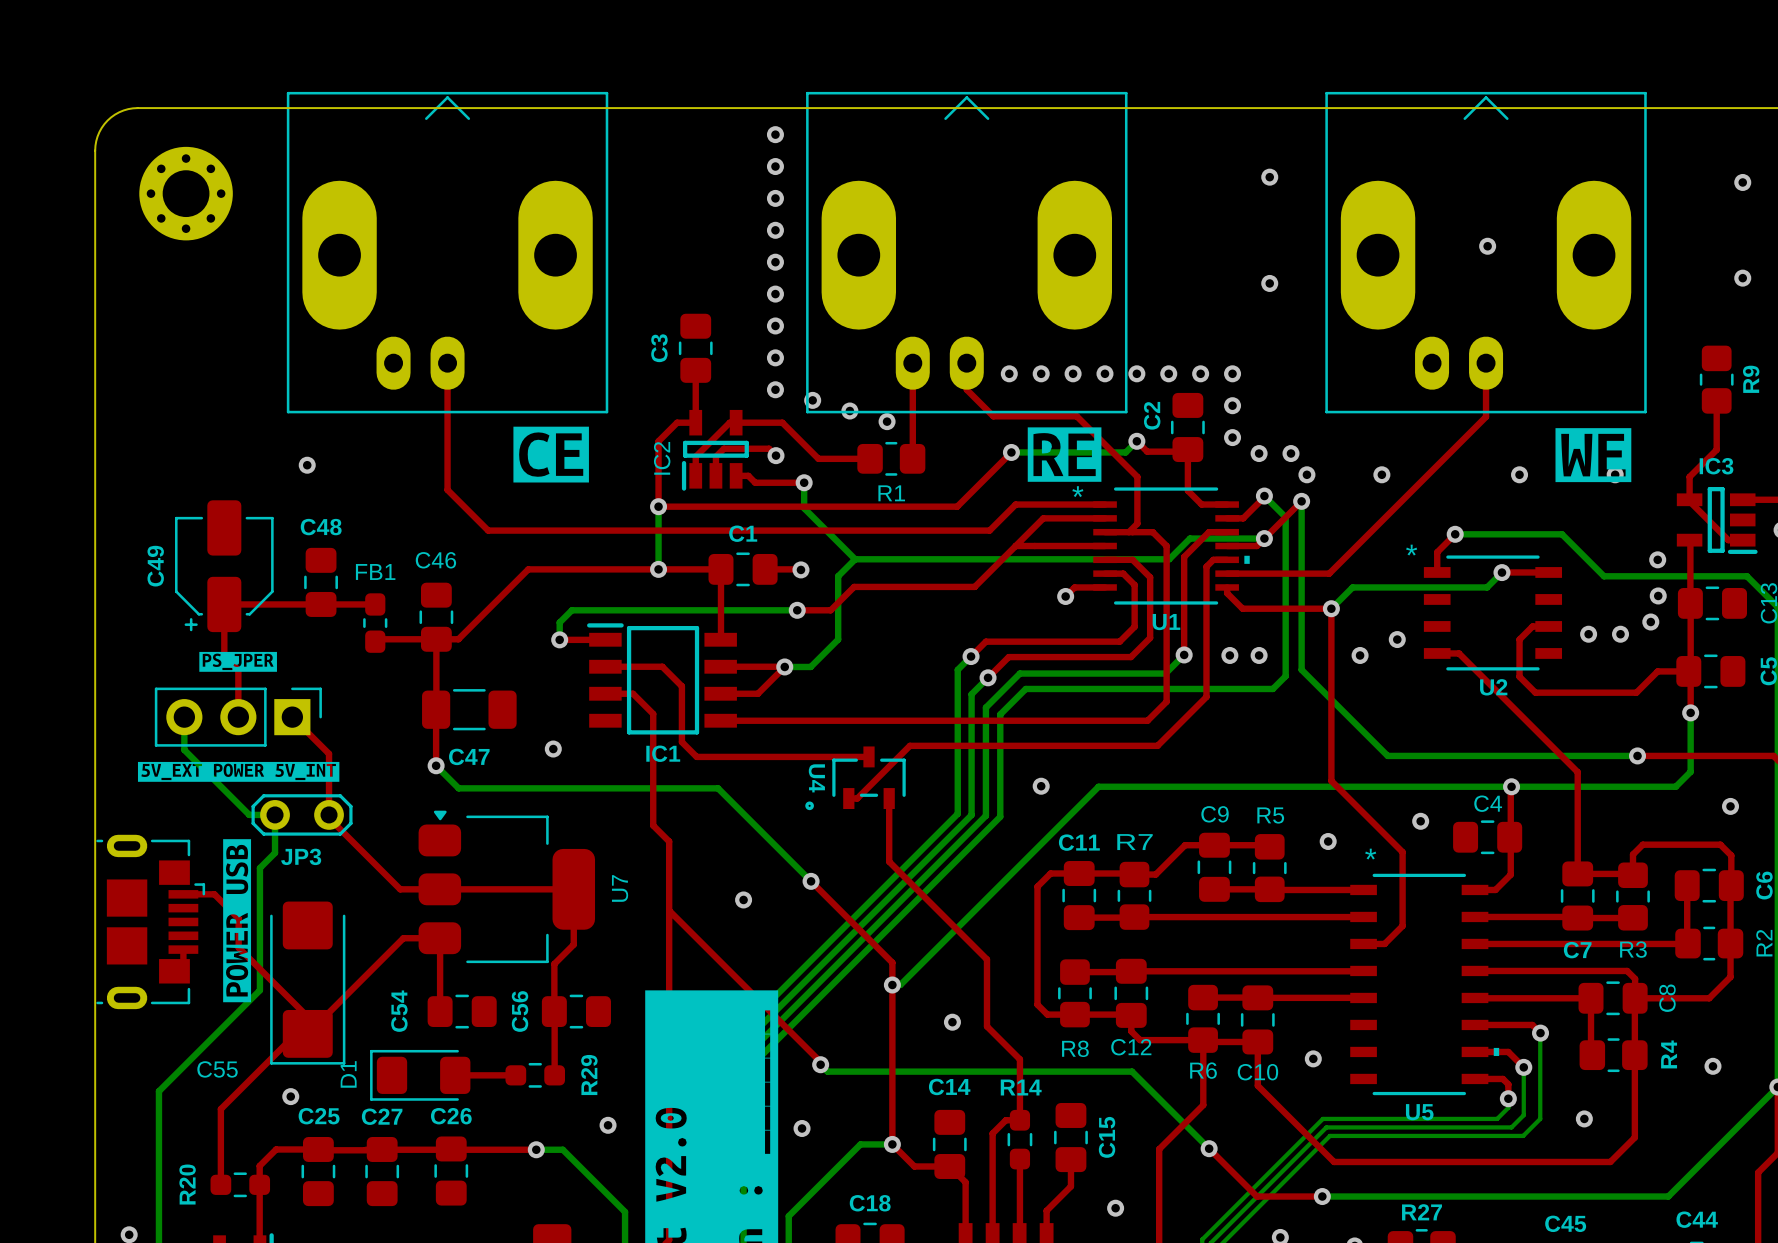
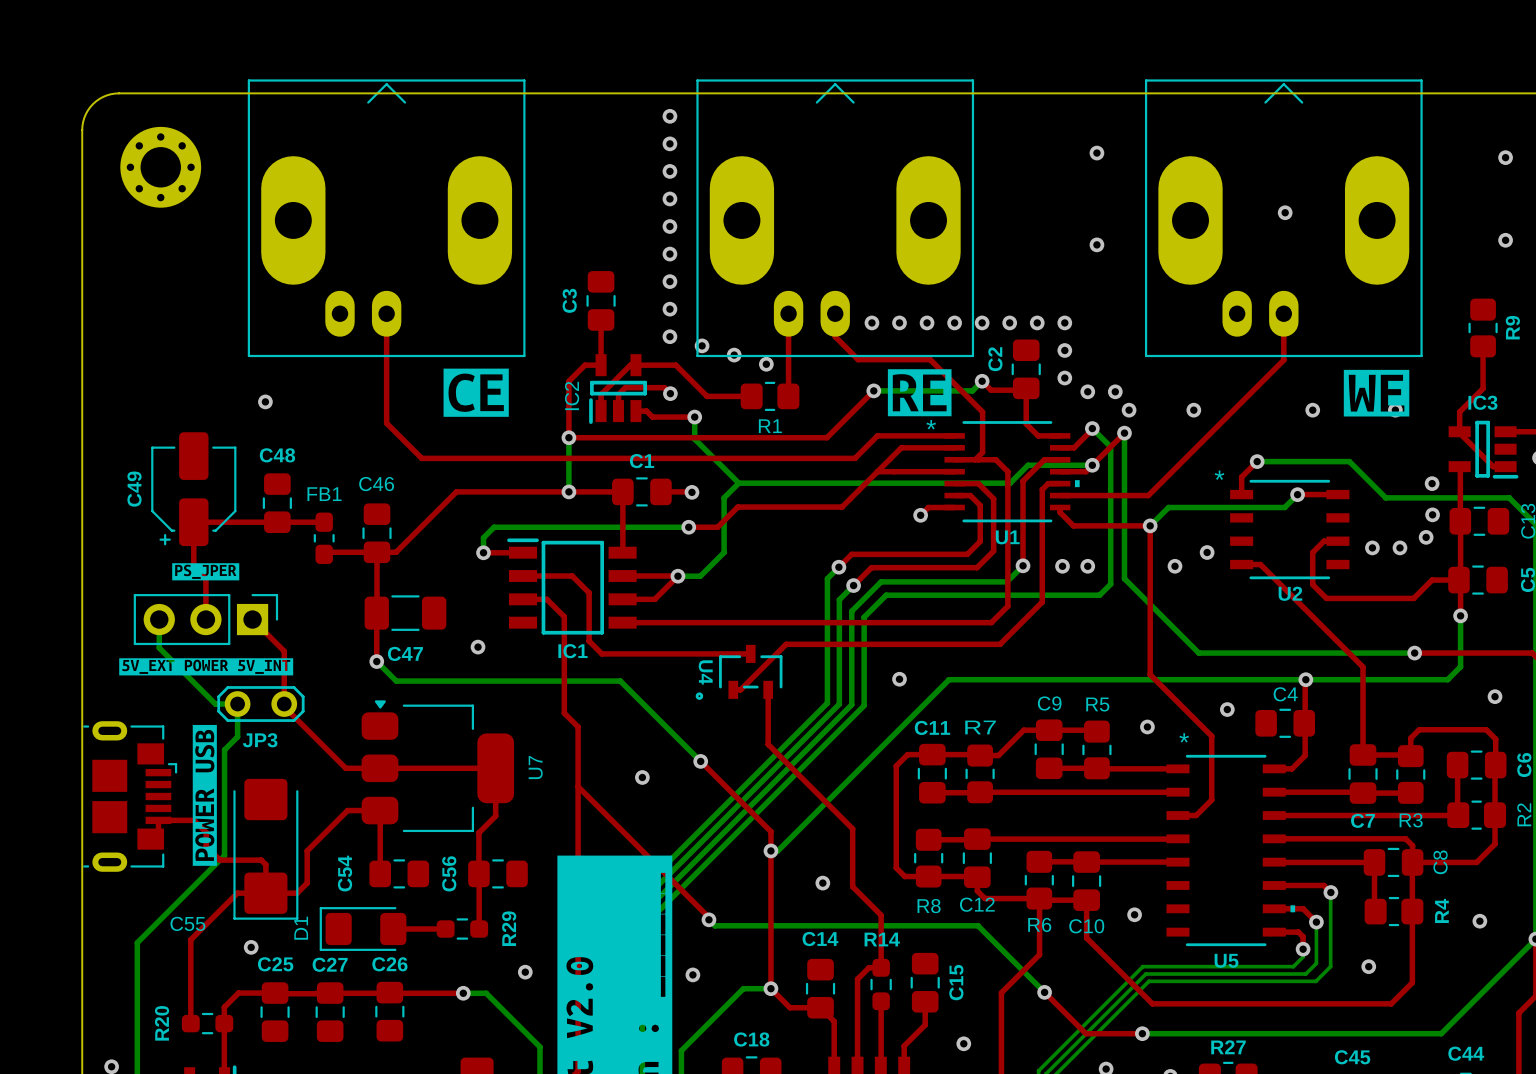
top track: (183, 894) (214, 894) (238, 918) (238, 947) (307, 1016) -> (167, 820) (193, 820) (206, 832) (206, 846) (219, 860) (261, 860) (265, 864) (265, 878)
top track: (403, 938) (307, 1033) -> (348, 810) (307, 850) (307, 883) (297, 893) (265, 893)
top track: (296, 1033) (220, 1109) -> (255, 893) (237, 893) (190, 939) (190, 958)

